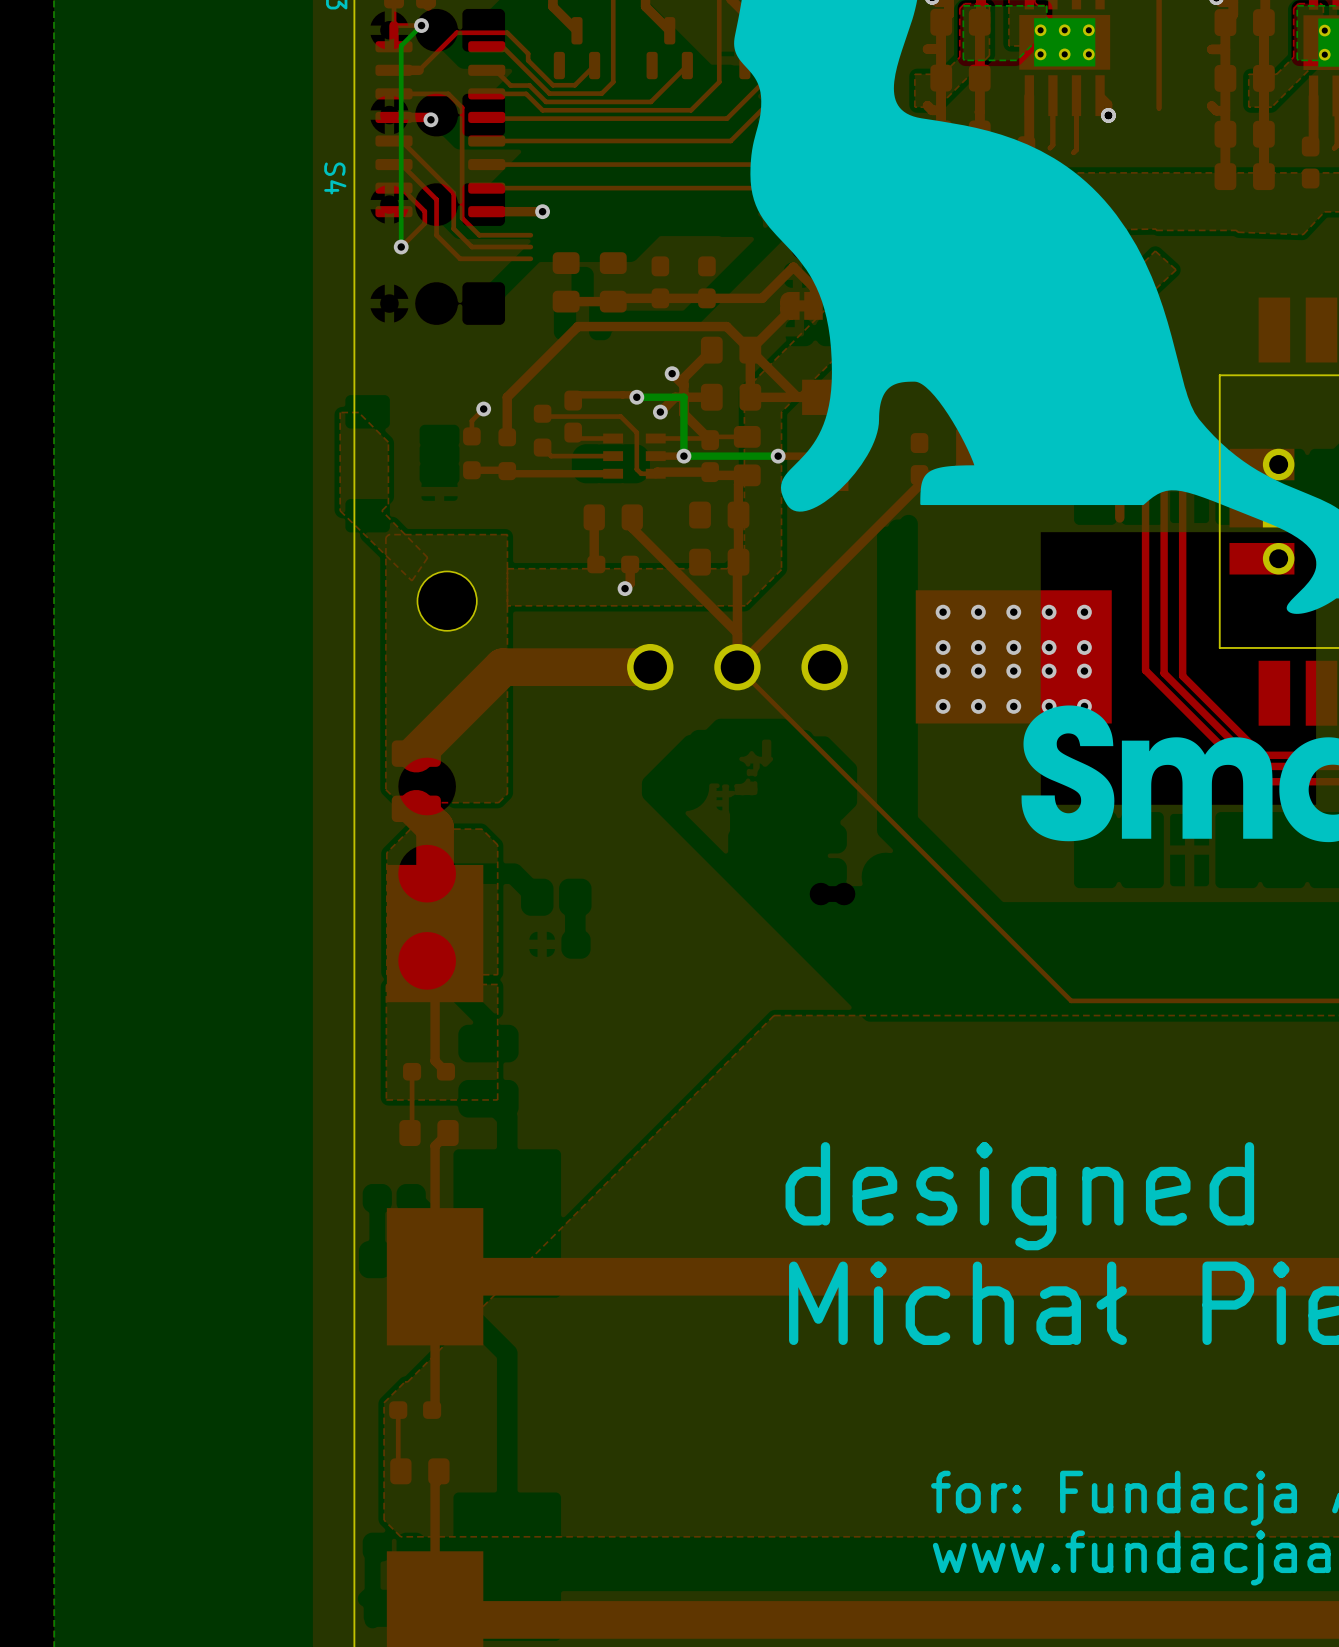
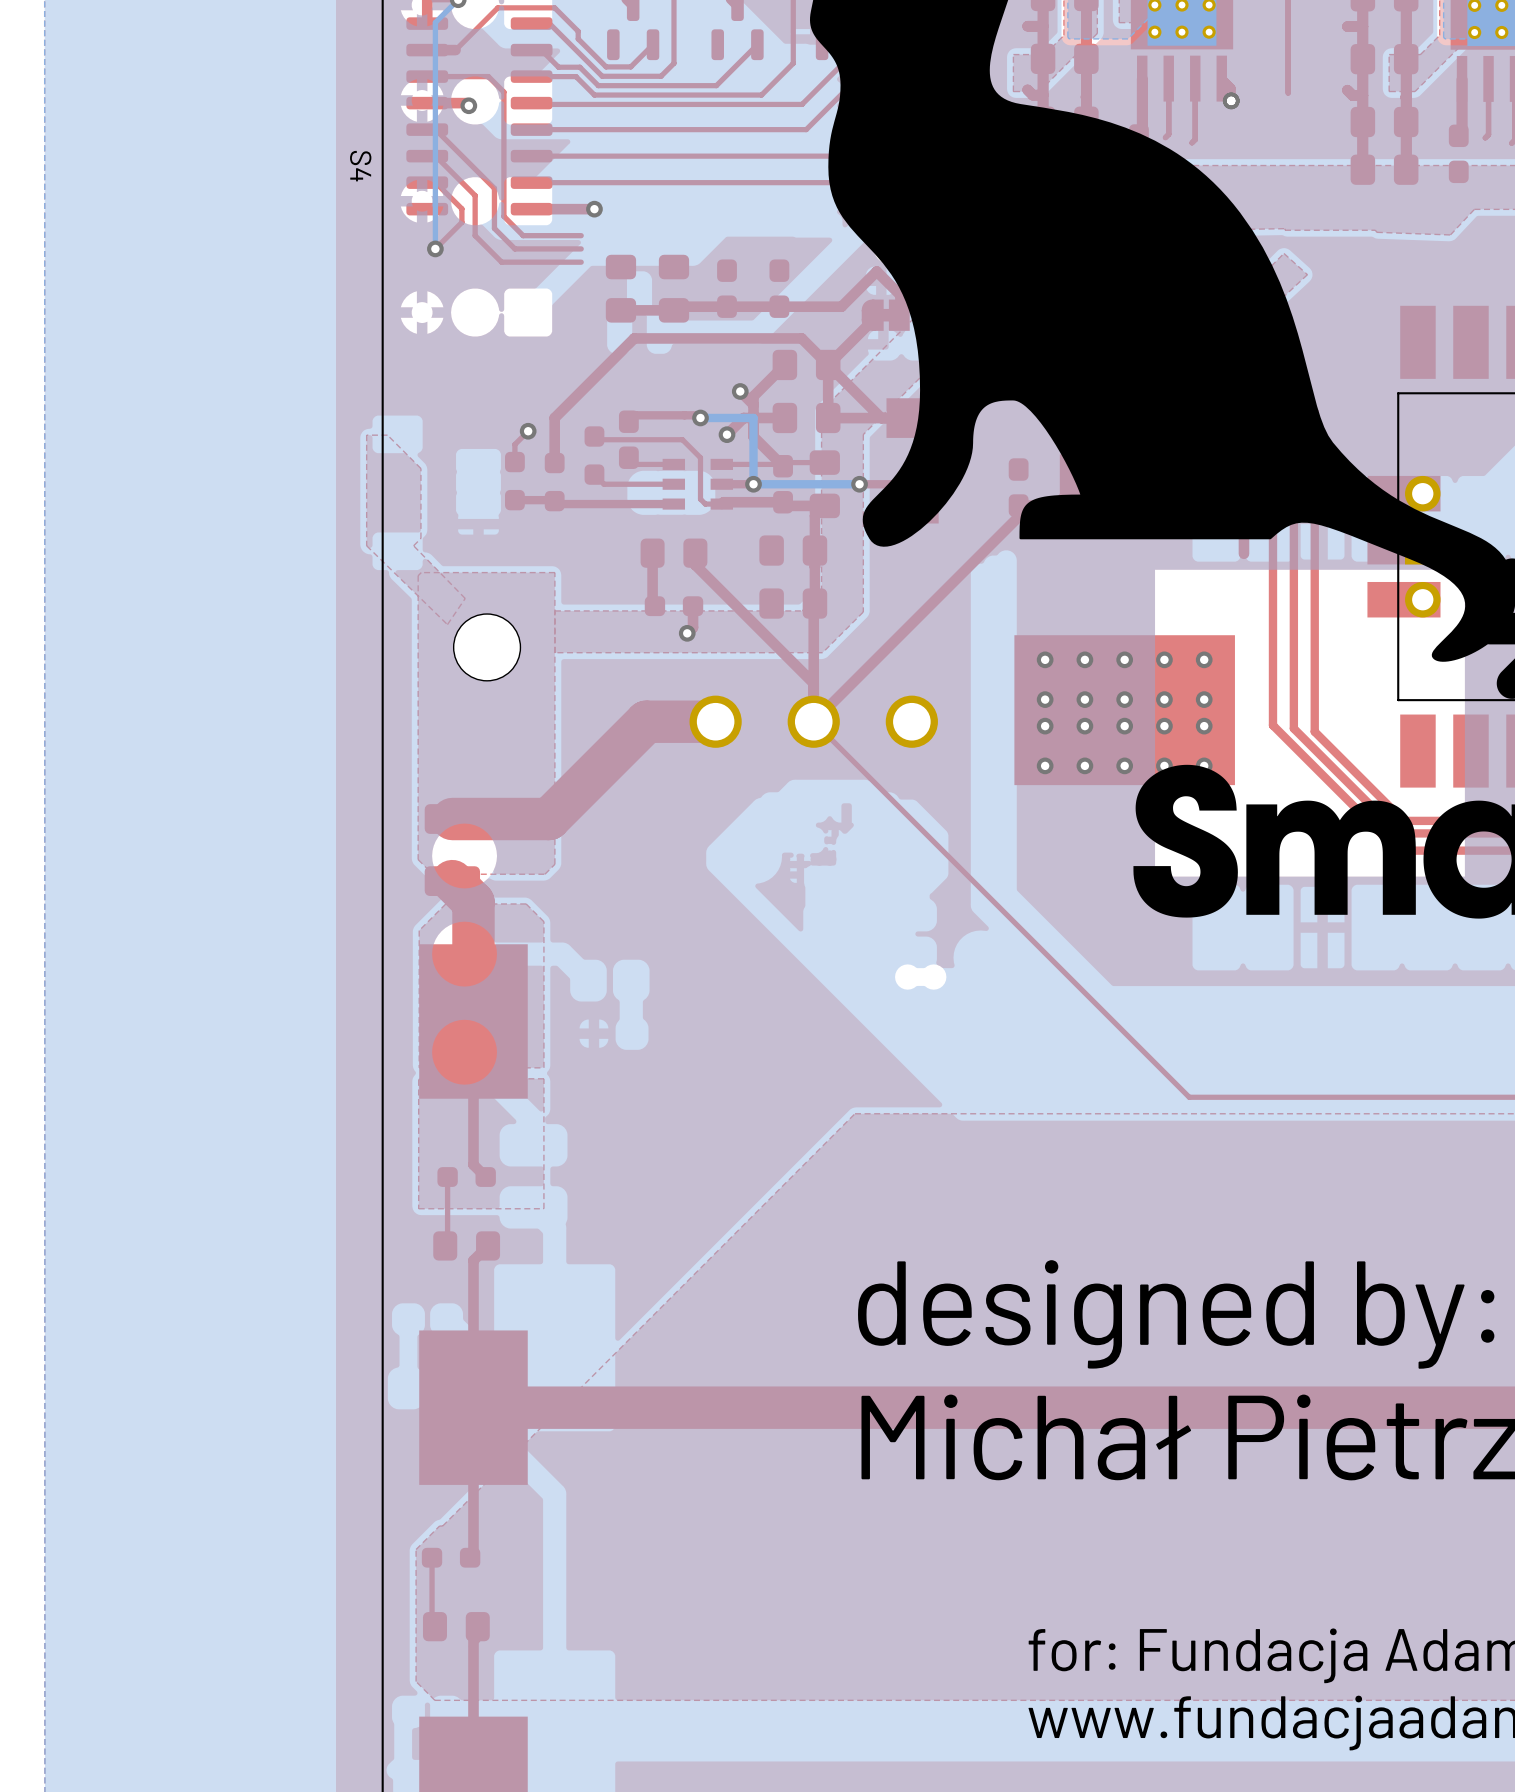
board edge: (1256, 375) (1219, 375) (1219, 647) (1256, 647) -> (1398, 393) (1398, 700)
top track: (588, 667) (502, 667) (416, 753) -> (646, 721) (549, 819) (452, 819)

